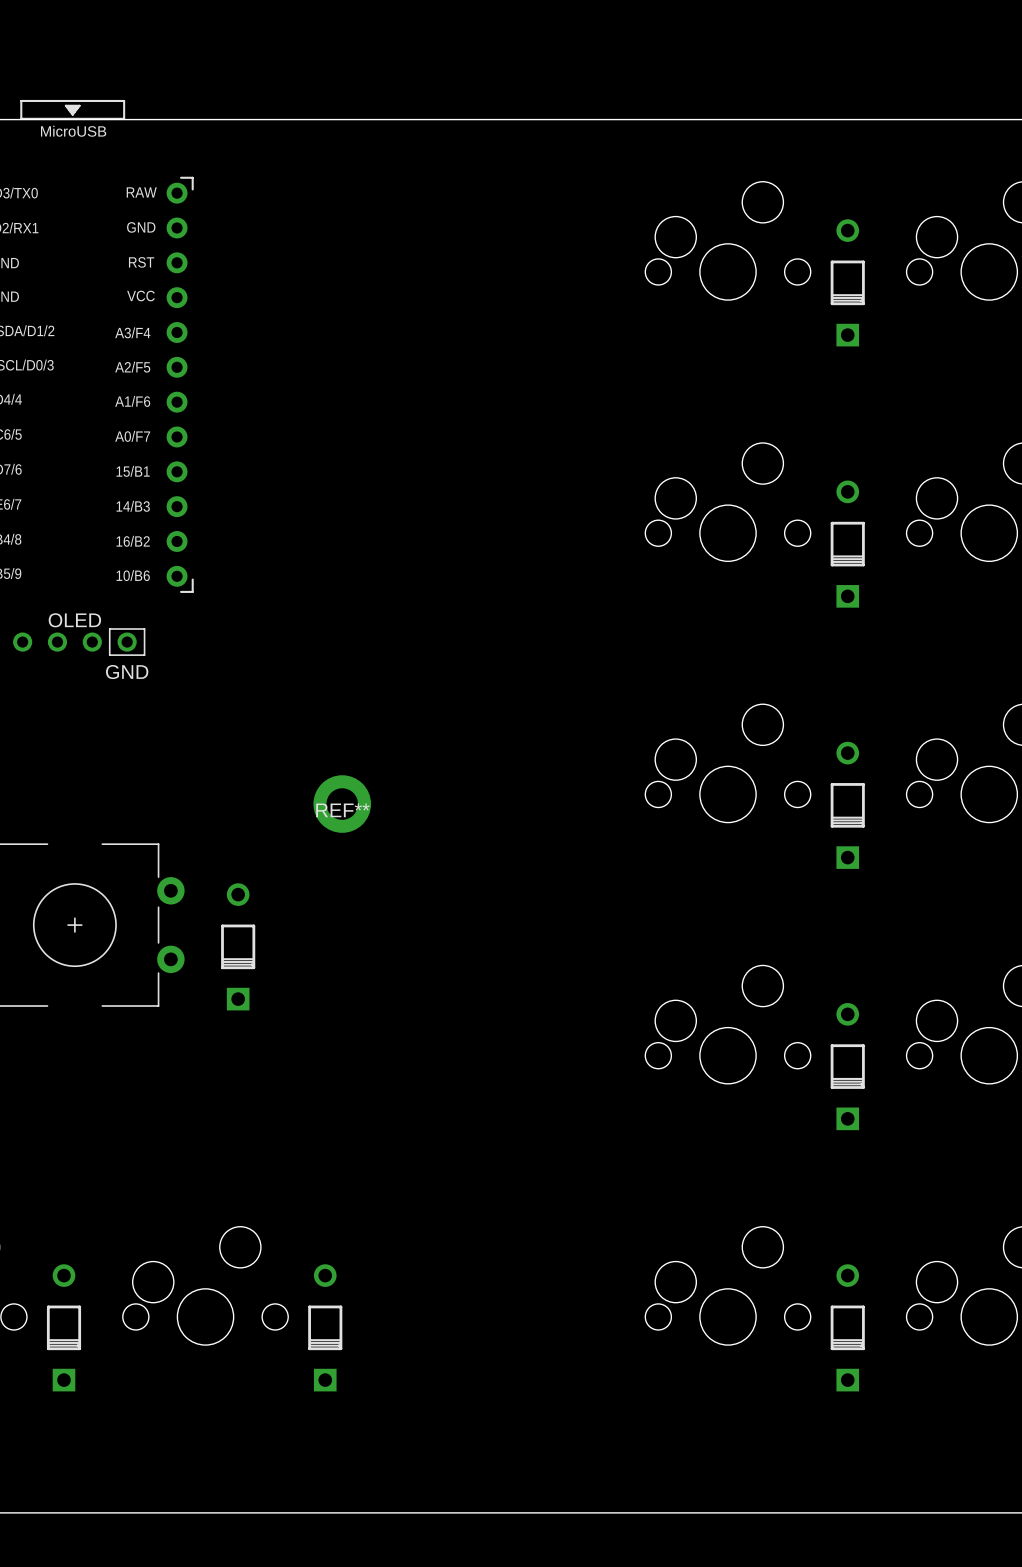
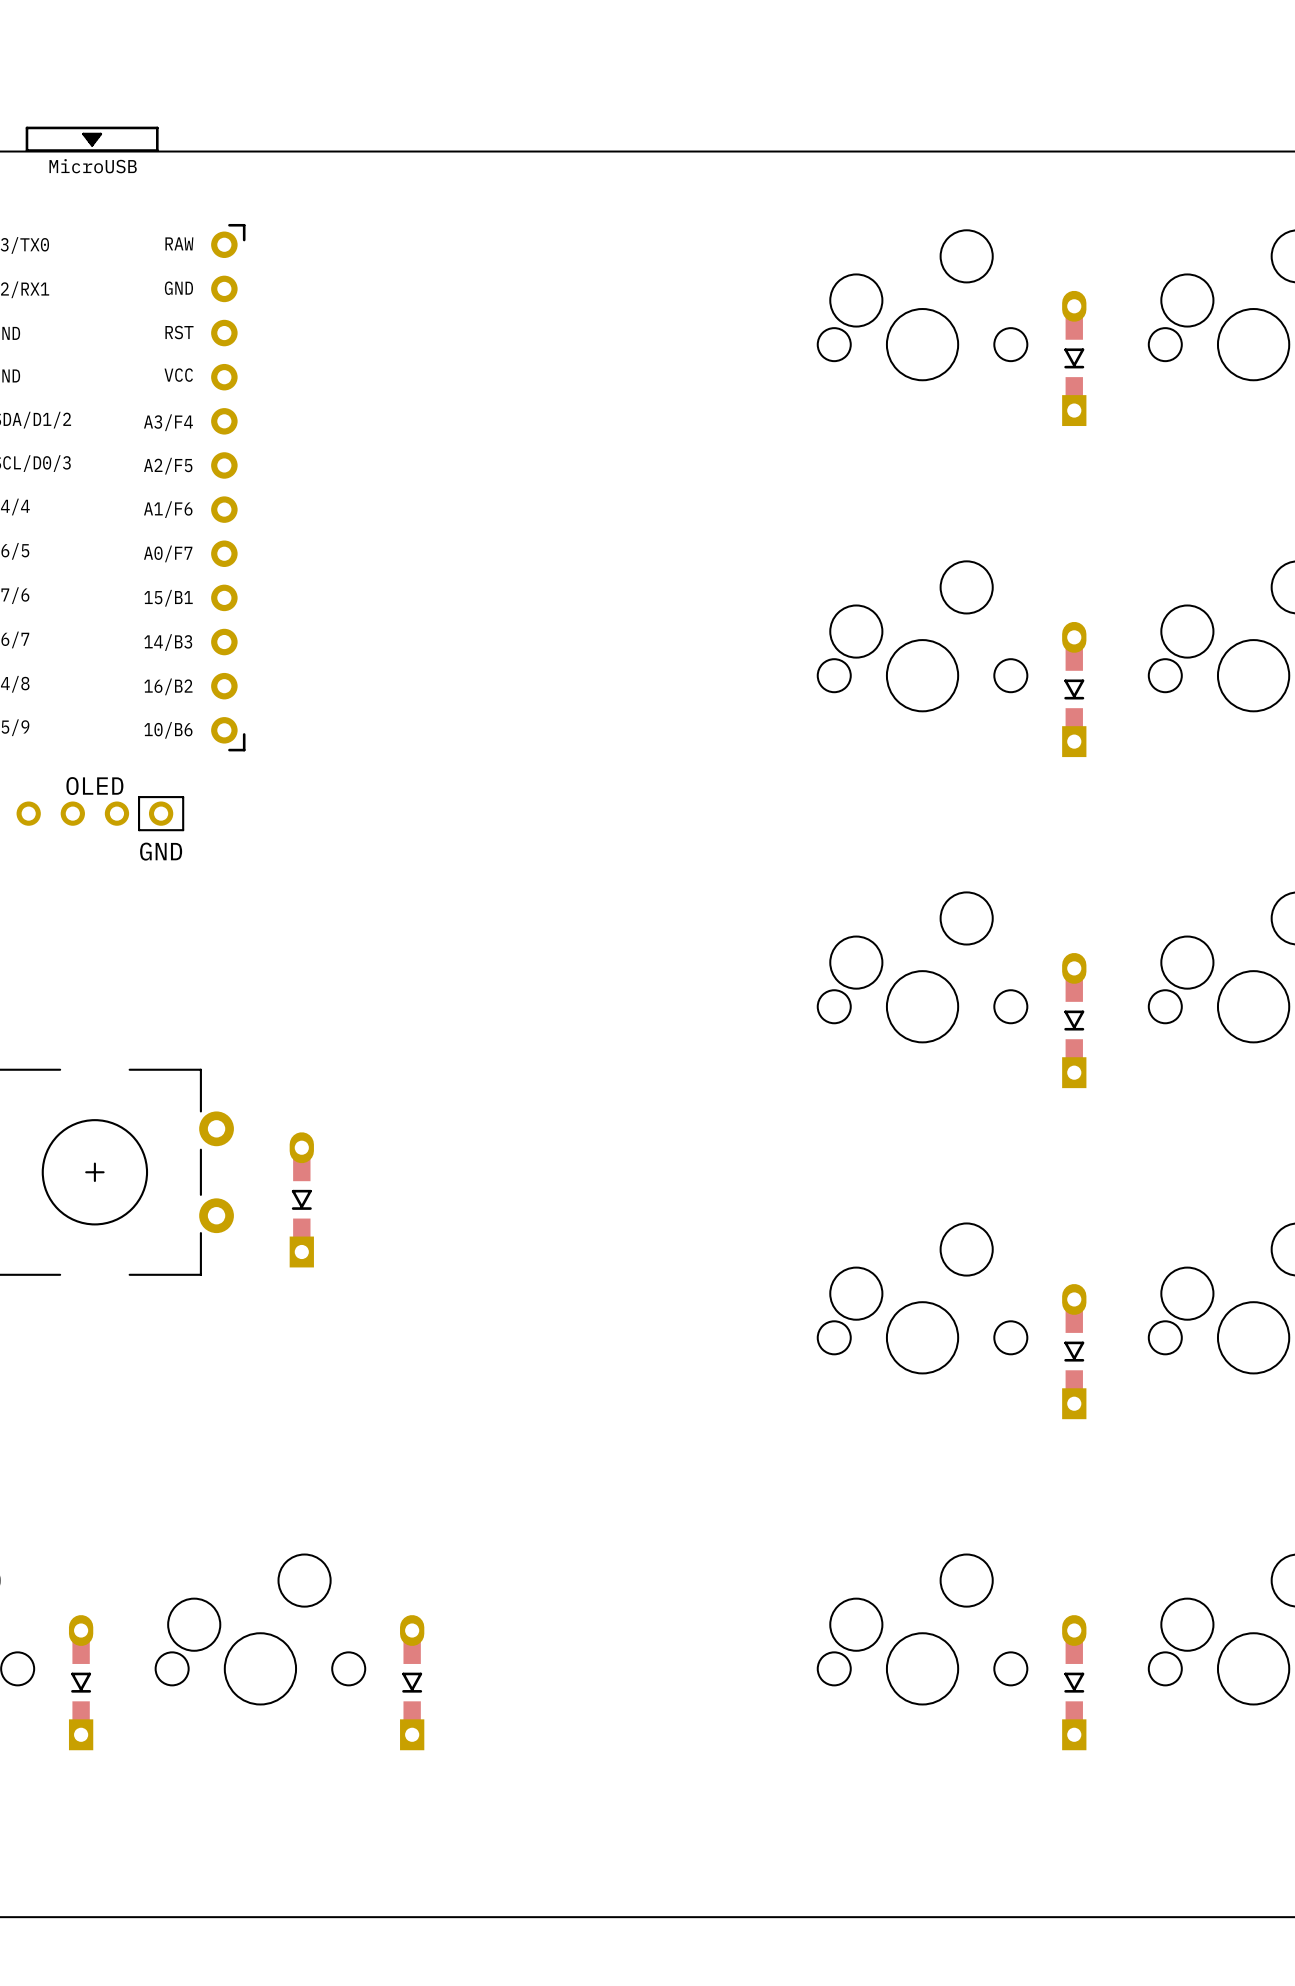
part footprint: [830, 219, 865, 347] -> [1062, 290, 1087, 427]
part footprint: [830, 480, 865, 608] -> [1062, 621, 1087, 758]
part footprint: [830, 741, 865, 869] -> [1062, 952, 1087, 1089]
REF**: (342, 804) -> none
part footprint: [221, 883, 256, 1011] -> [289, 1132, 314, 1268]
part footprint: [830, 1003, 865, 1131] -> [1062, 1284, 1087, 1420]
part footprint: [46, 1264, 82, 1392] -> [68, 1615, 94, 1751]
part footprint: [308, 1264, 343, 1392] -> [400, 1615, 425, 1751]
part footprint: [830, 1264, 865, 1392] -> [1062, 1615, 1087, 1751]

